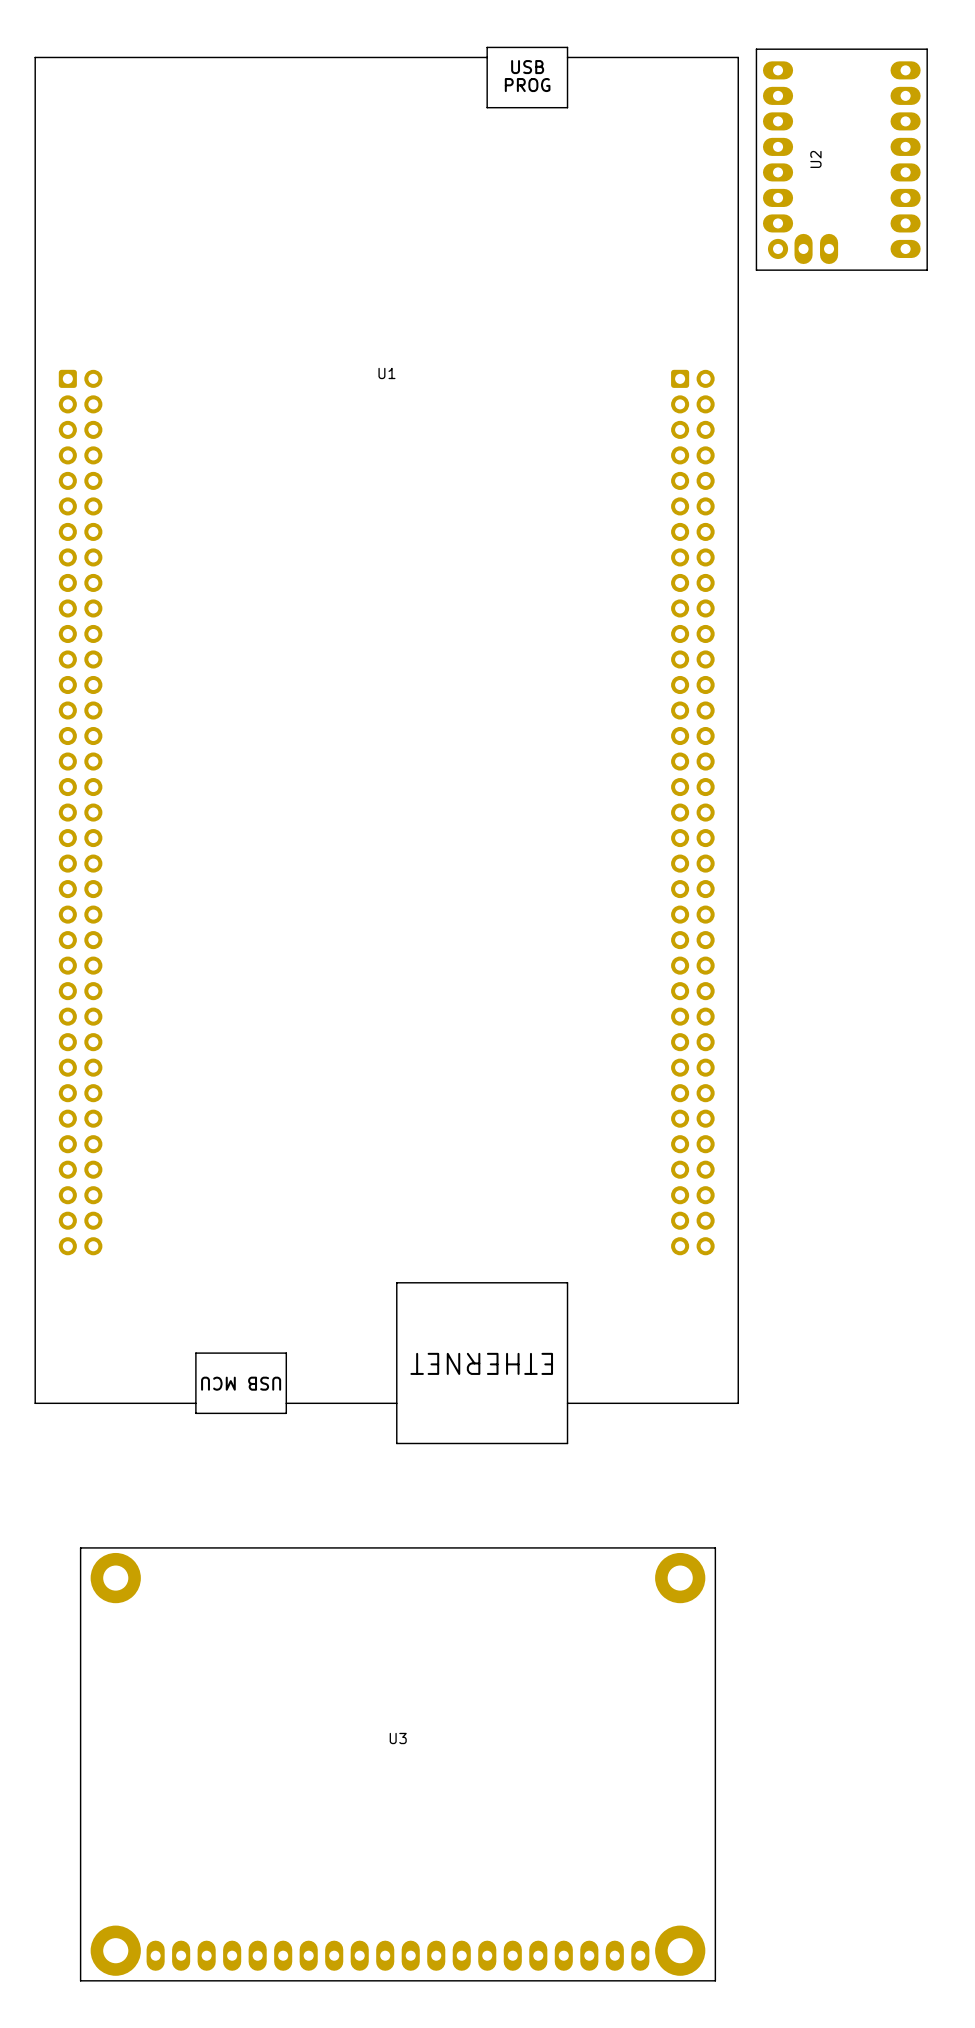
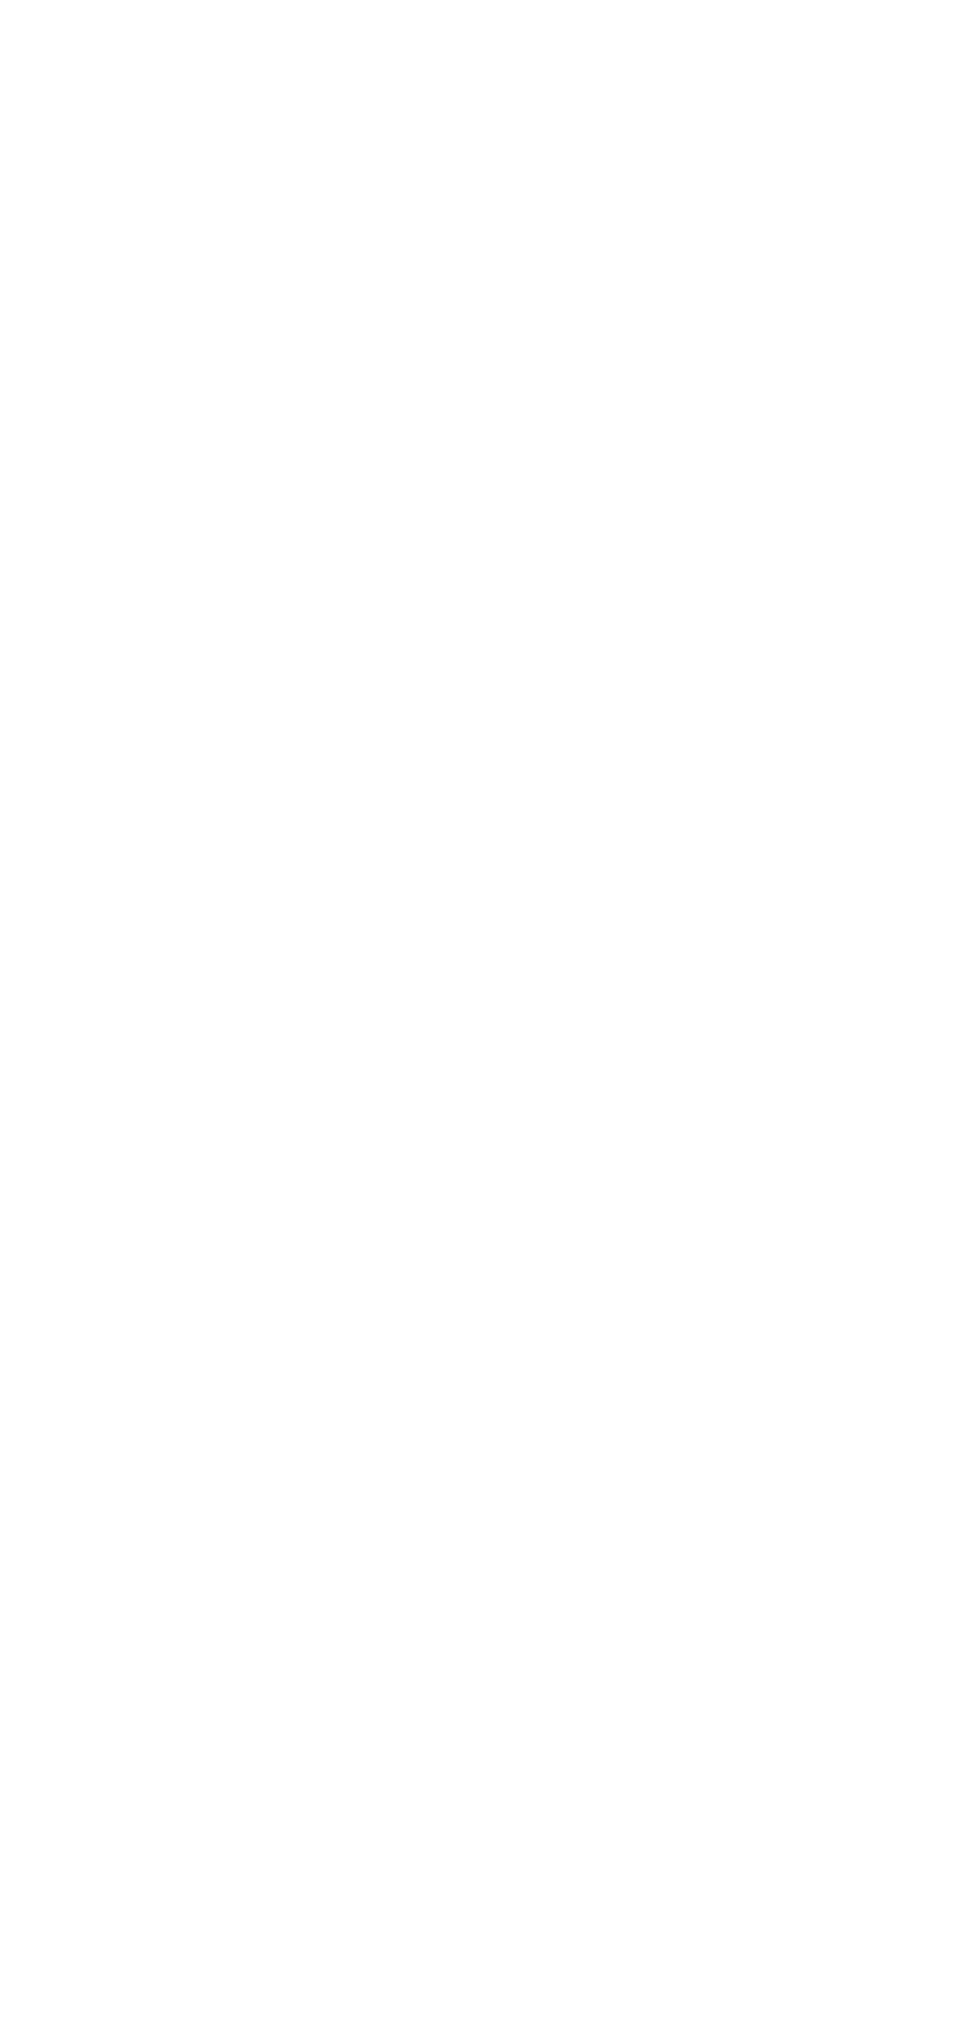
U2: (841, 159) -> none
U1: (386, 745) -> none
U3: (397, 1764) -> none

